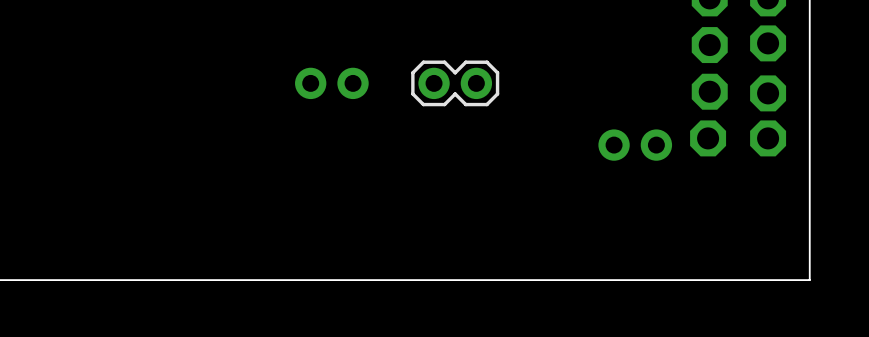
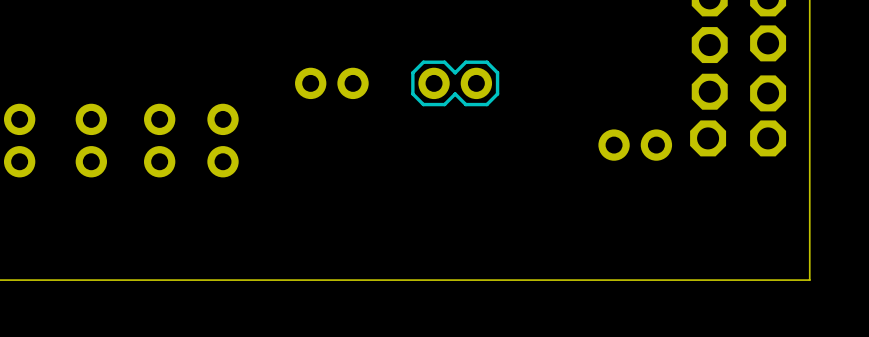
part: none -> (19, 140)
part: none -> (91, 140)
part: none -> (159, 140)
part: none -> (223, 140)

